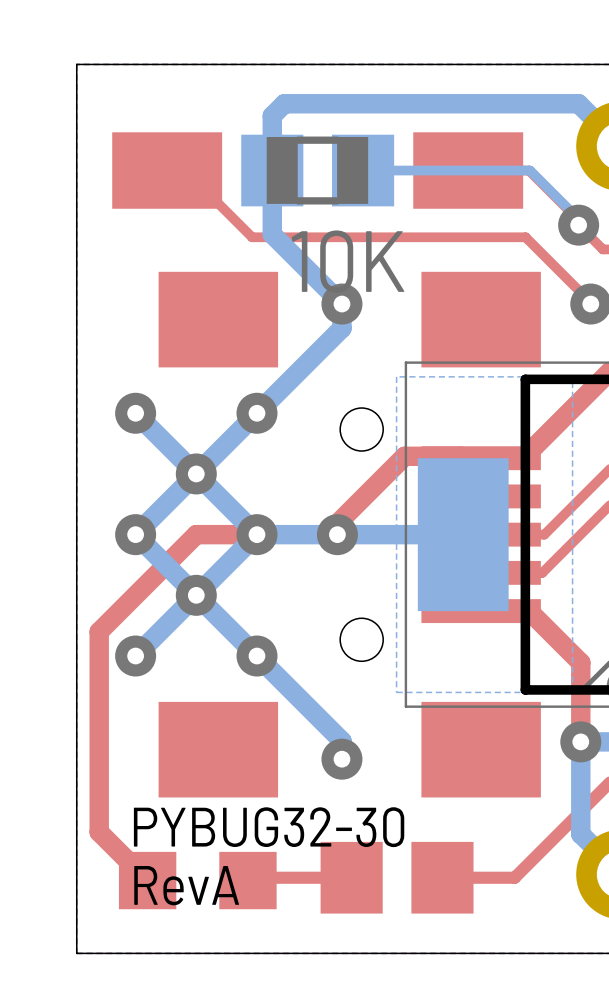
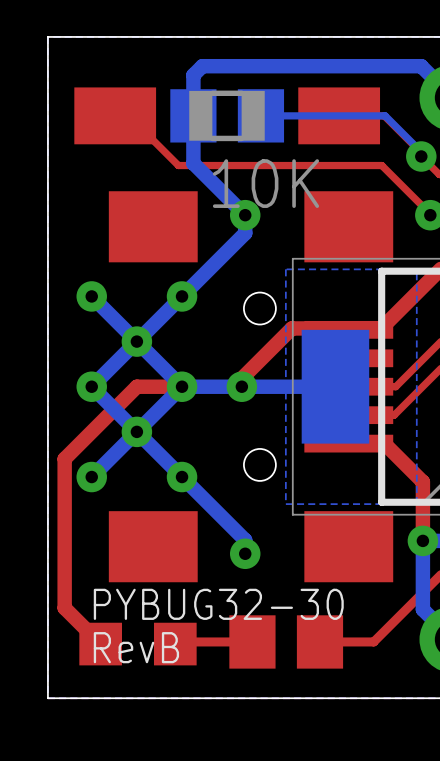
text: RevA (186, 885) -> RevB (136, 647)

